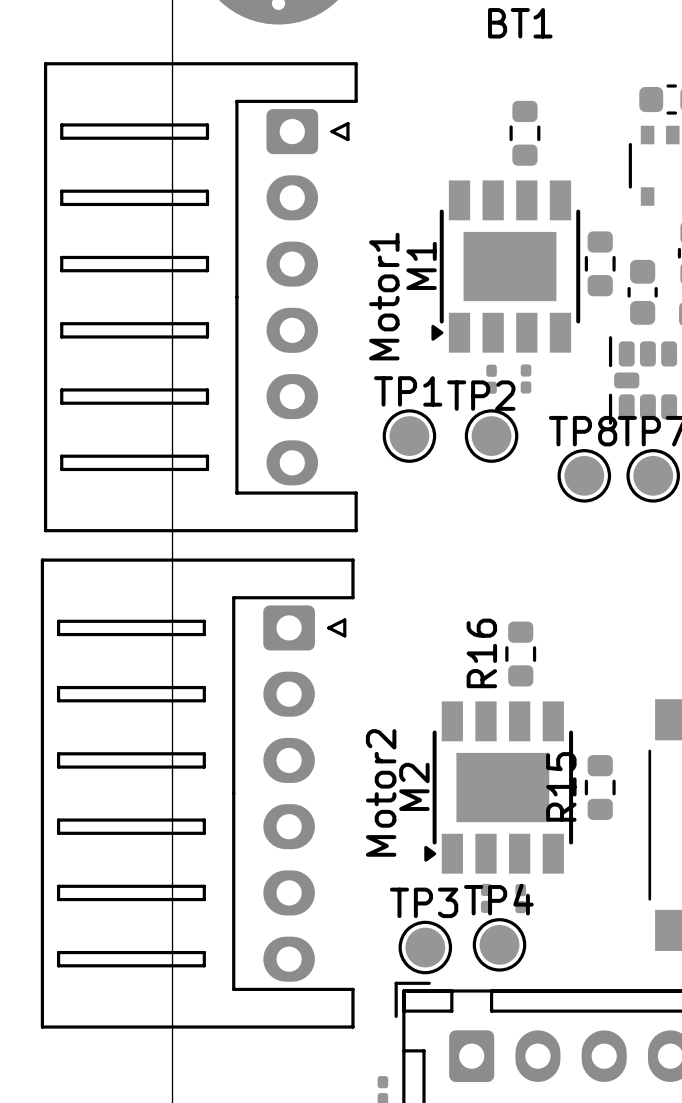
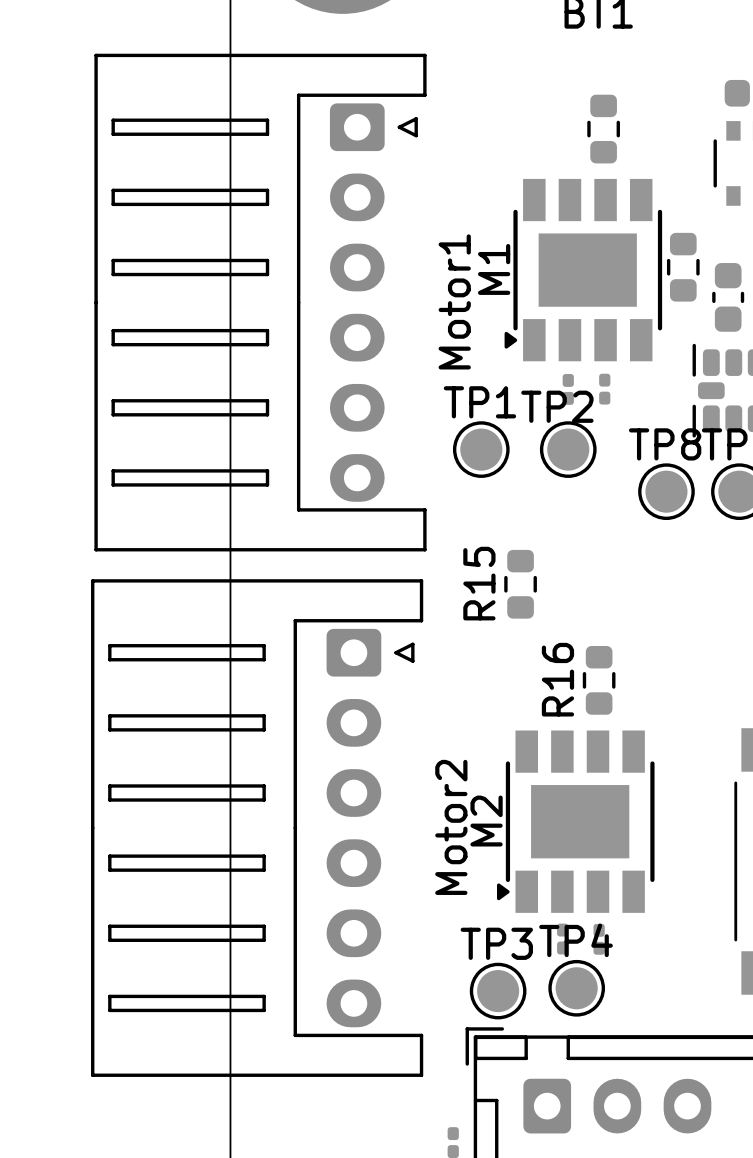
R15 position: (600, 787) -> (520, 584)

